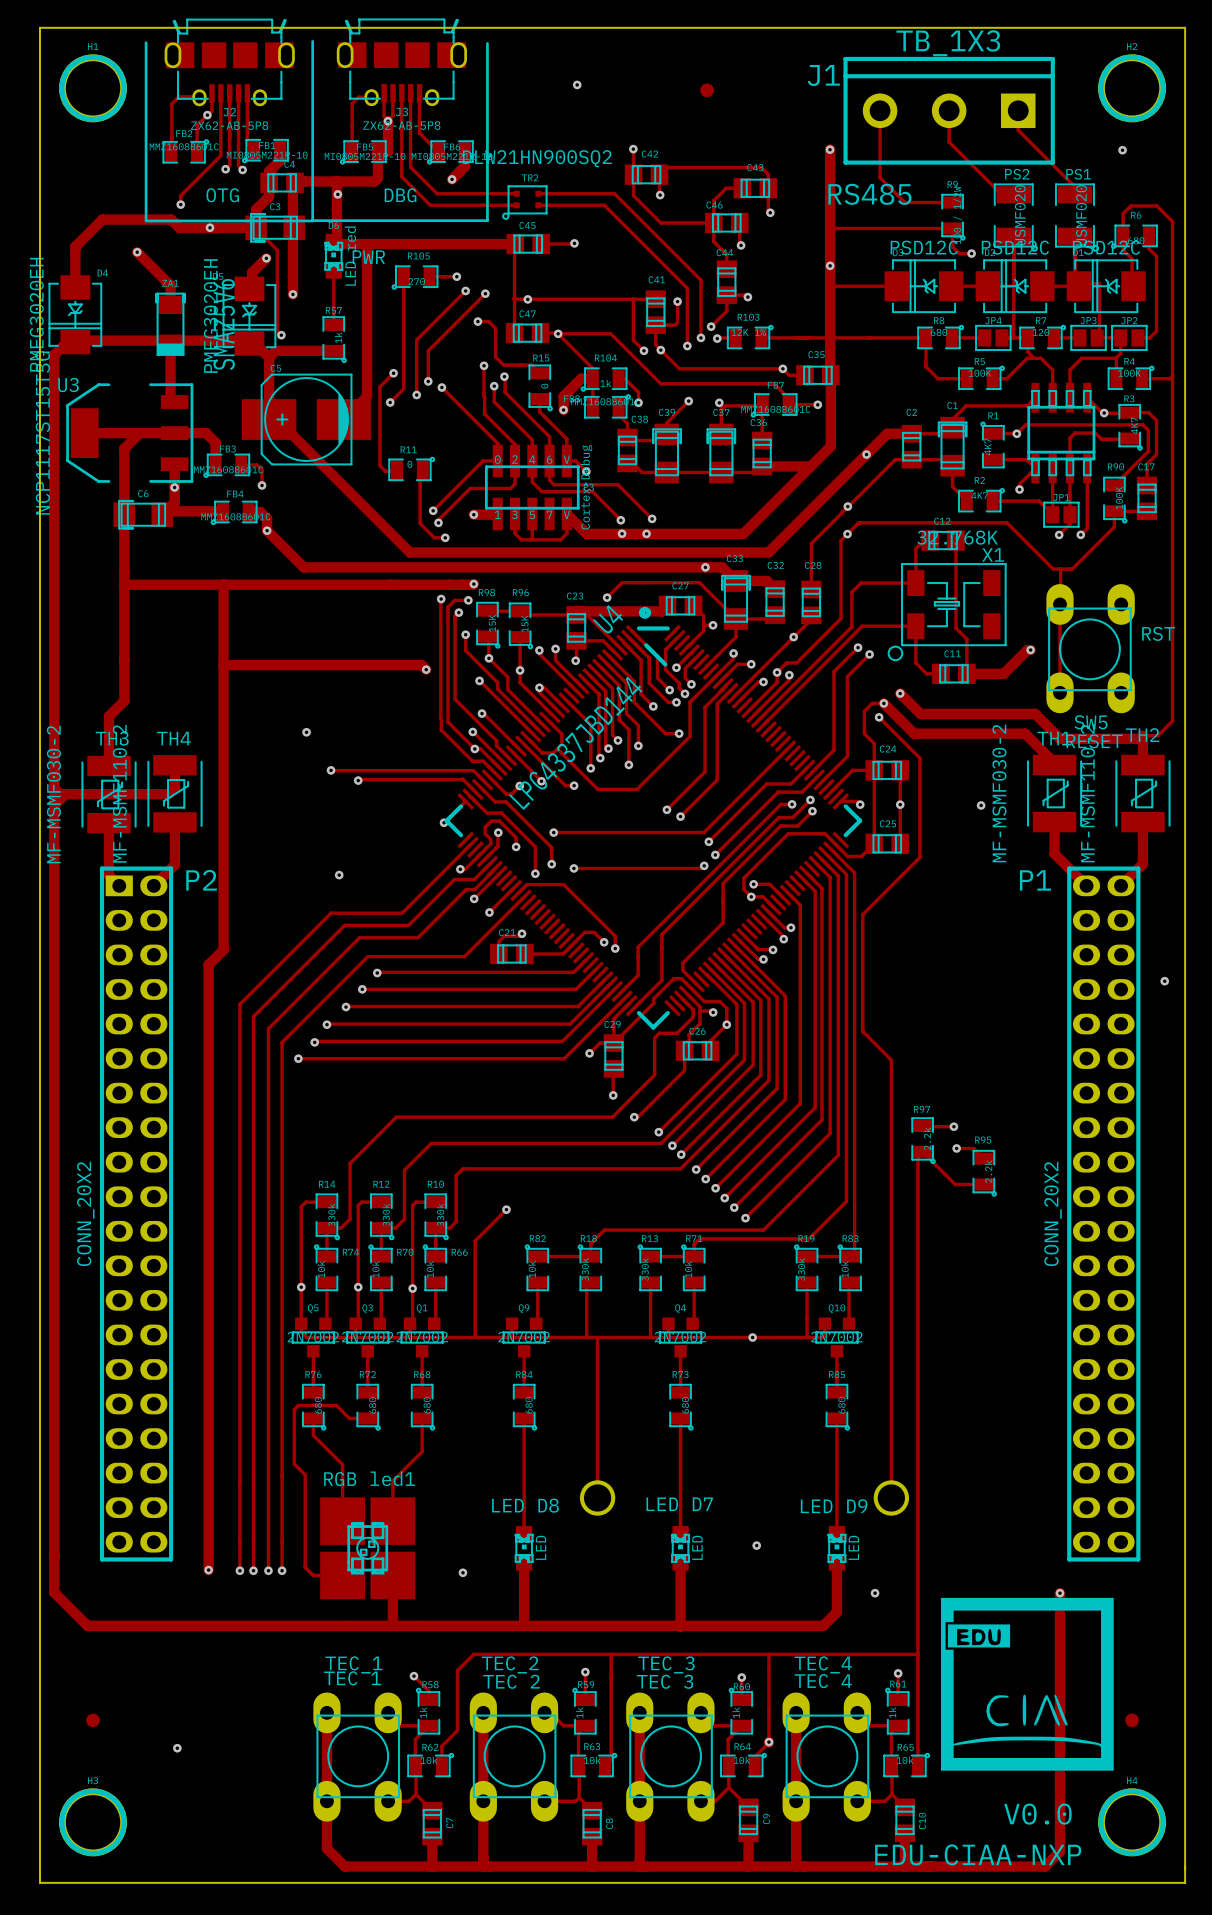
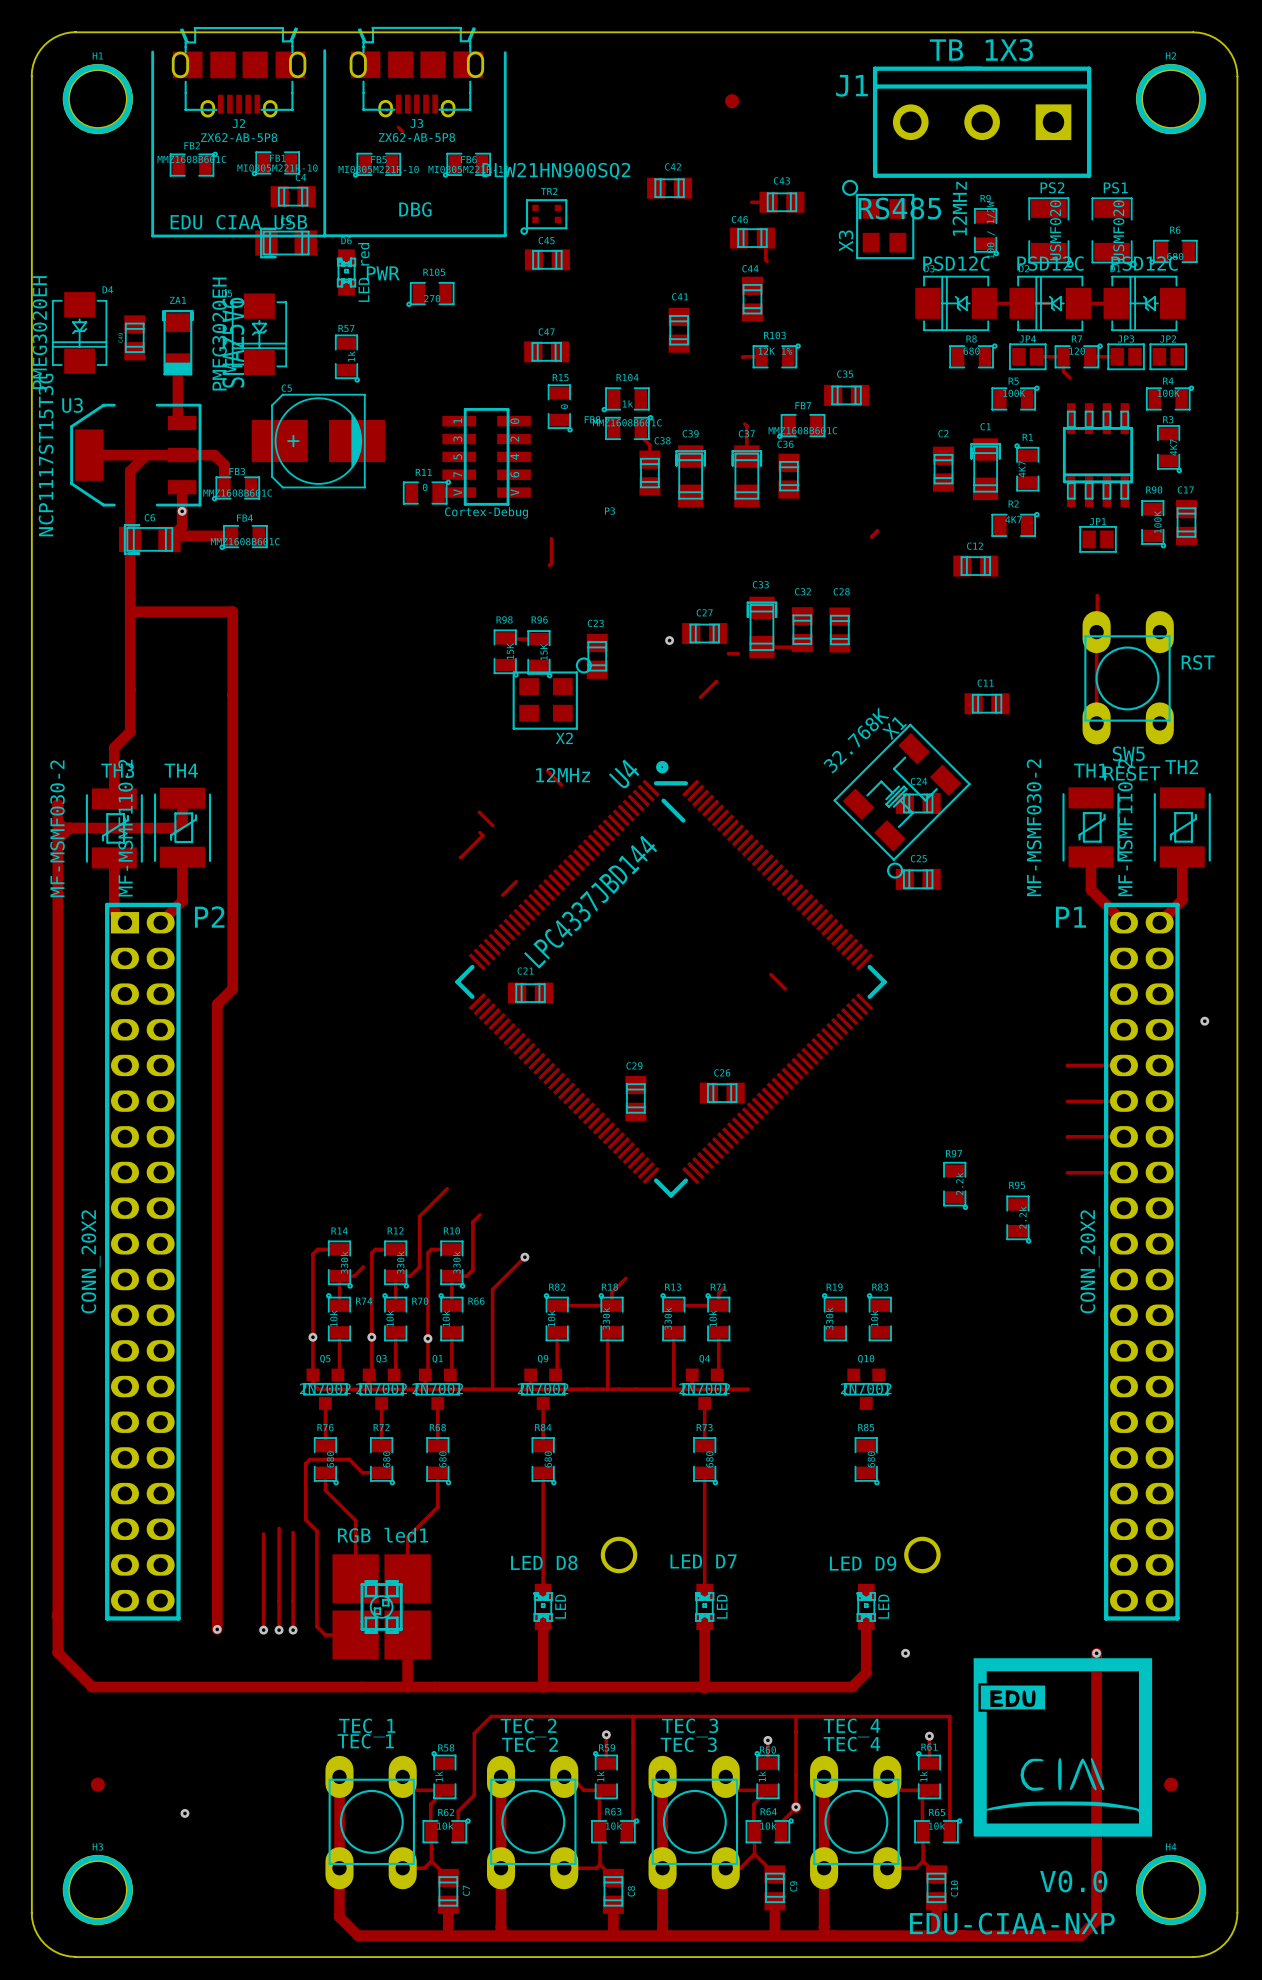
board edge: none -> (75, 32) (1193, 32) (1210, 35) (1224, 45) (1234, 59) (1237, 76)
board edge: none -> (75, 32) (59, 35) (44, 45) (35, 59) (31, 76)
board edge: (39, 27) (39, 1882) (1185, 1882) (1185, 27) (39, 27) -> none
board edge: none -> (31, 76) (31, 1913)
board edge: none -> (1237, 76) (1237, 1912) (1235, 1924) (1231, 1934) (1224, 1944) (1215, 1951) (1204, 1955) (1193, 1957) (75, 1957)
via: (577, 84) -> none
track: (212, 93) (212, 110) (207, 115) -> none
track: (220, 93) (220, 155) (180, 195) (180, 204) -> none
track: (229, 93) (229, 165) (225, 169) -> none
track: (238, 93) (238, 165) (242, 169) -> none
track: (247, 93) (247, 143) (254, 150) -> none
track: (384, 93) (384, 116) -> none
track: (392, 93) (392, 115) (388, 119) (388, 151) -> none
track: (401, 93) (401, 176) (430, 205) (516, 205) -> none
track: (410, 93) (410, 167) (437, 193) (516, 193) -> none
track: (419, 93) (419, 133) (438, 152) -> none
track: (199, 96) (179, 96) (171, 104) (171, 157) -> none
track: (371, 97) (358, 97) (352, 103) (352, 152) -> none
track: (880, 110) (880, 177) (904, 202) (952, 202) -> none
track: (949, 110) (949, 142) (1001, 194) (1013, 194) -> none
track: (1018, 110) (1018, 130) (1074, 186) (1074, 194) -> none
track: (207, 115) (197, 125) (197, 152) -> none
via: (207, 115) -> none
via: (388, 121) -> none
track: (633, 149) (633, 195) (660, 222) (713, 222) -> none
via: (633, 149) -> none
track: (830, 149) (830, 446) -> none
via: (830, 149) -> none
track: (280, 150) (280, 160) (269, 171) (269, 196) (256, 209) (256, 227) -> none
via: (1122, 150) -> none
track: (387, 151) (377, 151) (377, 178) (374, 181) (291, 181) (292, 294) -> none
track: (465, 151) (465, 166) (452, 179) -> none
via: (225, 169) -> none
via: (242, 169) -> none
via: (452, 179) -> none
track: (337, 181) (337, 238) (333, 242) (335, 244) (515, 244) -> none
track: (725, 188) (713, 200) -> none
track: (538, 193) (614, 193) (700, 280) (700, 337) -> none
via: (337, 194) -> none
text: OTG (222, 195) -> none
track: (660, 195) (659, 174) (666, 167) (761, 167) (768, 174) (768, 210) (770, 212) -> none
via: (660, 195) -> none
track: (713, 200) (713, 241) (726, 254) (726, 269) -> none
via: (180, 204) -> none
X3: none -> 12MHz (878, 219)
track: (538, 205) (604, 205) (687, 288) (687, 346) -> none
text: none -> EDU CIAA USB (238, 222)
via: (770, 212) -> none
track: (102, 219) (75, 246) (75, 287) -> none
track: (102, 219) (171, 219) -> none
track: (171, 219) (179, 227) (256, 227) -> none
via: (209, 227) -> none
track: (256, 227) (277, 250) (277, 331) (281, 335) -> none
track: (830, 229) (952, 228) (952, 246) (959, 253) (971, 253) -> none
track: (1149, 235) (1149, 248) (1156, 256) (1156, 331) (1149, 337) (1137, 337) -> none
track: (1013, 236) (1013, 337) -> none
track: (1074, 236) (1074, 283) (1099, 283) (1099, 335) (1097, 337) (1120, 337) (1120, 353) (1116, 357) (1116, 378) -> none
track: (574, 243) (541, 244) -> none
via: (574, 243) -> none
track: (367, 244) (367, 396) (343, 419) -> none
track: (515, 244) (514, 333) -> none
via: (741, 245) -> none
track: (137, 252) (170, 285) (170, 304) -> none
via: (137, 252) -> none
via: (971, 253) -> none
track: (266, 258) (252, 272) (252, 286) (249, 288) -> none
via: (266, 258) -> none
via: (830, 265) -> none
track: (333, 270) (333, 324) -> none
track: (403, 276) (403, 388) (390, 402) -> none
track: (429, 276) (456, 276) -> none
via: (456, 276) -> none
track: (1132, 283) (1132, 259) (1123, 250) (1123, 213) (1130, 205) (1156, 205) (1172, 221) (1172, 721) (1157, 735) (1142, 735) (1142, 764) -> none
track: (830, 286) (896, 286) -> none
track: (465, 290) (416, 339) (416, 395) -> none
via: (465, 290) -> none
track: (485, 293) (428, 350) (428, 381) -> none
via: (485, 293) -> none
via: (292, 294) -> none
track: (747, 297) (745, 295) (726, 295) (726, 311) (711, 326) -> none
via: (747, 297) -> none
track: (514, 298) (655, 299) -> none
via: (527, 299) -> none
track: (633, 299) (633, 340) (643, 350) -> none
track: (677, 301) (677, 322) (675, 325) (655, 325) (655, 345) (679, 368) (782, 368) (789, 375) (804, 375) -> none
via: (677, 301) -> none
part: none -> (134, 337)
track: (477, 321) (488, 321) (495, 328) (495, 356) (503, 365) (531, 365) (539, 373) -> none
via: (477, 321) -> none
via: (711, 326) -> none
track: (540, 333) (557, 333) (592, 368) (592, 407) -> none
track: (558, 333) (610, 333) (660, 383) (774, 383) (786, 395) (786, 405) (817, 404) -> none
via: (558, 333) -> none
via: (281, 335) -> none
via: (700, 337) -> none
track: (761, 337) (926, 337) (926, 366) (937, 378) (966, 378) -> none
track: (951, 337) (984, 337) -> none
via: (717, 338) -> none
via: (687, 346) -> none
track: (333, 350) (275, 350) (269, 357) -> none
via: (643, 350) -> none
via: (660, 350) -> none
track: (269, 357) (269, 419) (276, 419) (409, 552) (768, 552) (887, 433) (946, 433) (952, 427) (952, 419) (966, 405) (1027, 405) (1035, 397) -> none
track: (269, 357) (252, 340) (68, 340) (54, 354) (54, 771) -> none
track: (1116, 358) (1081, 358) (1069, 370) (1069, 397) -> none
track: (484, 365) (484, 414) (515, 444) (515, 484) (510, 488) (470, 488) (438, 520) (438, 522) -> none
via: (484, 365) -> none
via: (782, 368) -> none
track: (393, 373) (379, 386) (379, 465) (385, 471) (394, 471) -> none
via: (393, 373) -> none
track: (1172, 375) (1169, 378) (1142, 378) -> none
track: (504, 376) (505, 392) (549, 436) (549, 480) (554, 484) (617, 484) (652, 518) -> none
via: (504, 376) -> none
track: (592, 378) (581, 378) (563, 396) (563, 409) -> none
track: (992, 378) (1006, 378) (1027, 358) (1040, 358) (1052, 370) (1052, 397) -> none
via: (428, 381) -> none
track: (618, 382) (618, 378) (624, 378) (638, 392) (638, 402) -> none
track: (494, 386) (494, 401) (532, 439) (532, 482) (541, 491) (592, 491) (620, 520) -> none
via: (494, 386) -> none
track: (441, 387) (497, 443) (497, 460) (483, 460) (433, 510) -> none
via: (441, 387) -> none
via: (416, 395) -> none
track: (1087, 397) (1102, 413) (1136, 413) -> none
track: (539, 399) (539, 412) (566, 439) (566, 460) (575, 460) (586, 471) -> none
track: (688, 401) (666, 422) (666, 434) (660, 440) (619, 440) -> none
via: (688, 401) -> none
via: (390, 402) -> none
via: (638, 402) -> none
via: (719, 402) -> none
via: (817, 404) -> none
via: (563, 409) -> none
track: (721, 409) (725, 405) (765, 405) (762, 409) (762, 440) -> none
track: (1129, 412) (1148, 412) (1156, 420) (1156, 454) (1147, 464) (1147, 485) -> none
via: (1104, 413) -> none
track: (993, 433) (1016, 433) (1025, 424) (1142, 424) (1148, 430) (1148, 451) (1114, 485) -> none
via: (1016, 433) -> none
track: (1136, 439) (1101, 439) (1095, 433) (1074, 433) (1069, 438) (1069, 524) (1059, 534) -> none
track: (830, 446) (743, 533) (586, 533) (566, 514) (566, 533) (560, 539) (521, 539) (515, 533) (515, 514) -> none
via: (866, 454) -> none
track: (993, 459) (1026, 459) (1035, 468) (1019, 484) (1019, 489) -> none
track: (241, 464) (257, 464) (262, 469) (262, 485) -> none
track: (619, 466) (636, 466) (642, 472) (756, 472) (762, 466) -> none
track: (762, 466) (810, 466) -> none
track: (1052, 468) (1052, 514) (1039, 501) (992, 501) -> none
track: (1087, 468) (1087, 528) (1080, 534) -> none
track: (420, 471) (420, 523) (434, 537) (445, 537) -> none
via: (586, 471) -> none
via: (262, 485) -> none
part rotation: 0° (532, 487) -> 90° clockwise (486, 456)
part position: (532, 487) -> (486, 456)
via: (1019, 489) -> none
track: (966, 501) (952, 486) (952, 465) (946, 459) (895, 459) (811, 543) (811, 589) -> none
via: (847, 506) -> none
via: (433, 510) -> none
track: (248, 511) (260, 511) (267, 518) (267, 530) (303, 567) (722, 567) (735, 581) (766, 581) (775, 589) -> none
track: (1147, 511) (1114, 511) (1114, 526) (1072, 569) (1053, 569) (1006, 522) (858, 522) (841, 540) (841, 618) (796, 662) (786, 662) (777, 672) (777, 682) (749, 710) -> none
track: (496, 513) (497, 514) (473, 514) -> none
via: (473, 514) -> none
via: (652, 518) -> none
via: (620, 520) -> none
via: (438, 522) -> none
via: (267, 530) -> none
via: (622, 533) -> none
via: (646, 533) -> none
via: (847, 534) -> none
via: (1059, 534) -> none
via: (1080, 534) -> none
via: (445, 537) -> none
track: (930, 544) (919, 544) (915, 548) (915, 583) (861, 583) (851, 592) (851, 626) (759, 719) -> none
track: (955, 544) (955, 628) (966, 639) (966, 673) (1003, 673) (1027, 650) (1030, 650) -> none
via: (705, 567) -> none
track: (473, 584) (223, 584) -> none
via: (473, 584) -> none
track: (607, 597) (622, 582) (699, 582) (735, 619) (735, 637) (706, 666) -> none
via: (607, 597) -> none
track: (441, 599) (441, 730) (472, 761) (483, 761) (494, 772) -> none
via: (441, 599) -> none
track: (468, 600) (454, 600) (447, 607) (447, 722) (474, 748) (480, 748) (499, 767) -> none
via: (468, 600) -> none
track: (667, 605) (662, 611) (580, 611) (576, 614) (523, 614) -> none
track: (693, 605) (703, 615) (703, 630) (686, 647) -> none
track: (572, 611) (583, 611) (619, 647) -> none
via: (458, 612) -> none
X1 rotation: 0° (947, 612) -> 45° counterclockwise (902, 801)
X1 position: (947, 612) -> (902, 801)
track: (811, 615) (811, 619) (735, 695) -> none
track: (455, 616) (455, 699) (496, 740) (496, 745) (509, 758) -> none
via: (713, 625) -> none
track: (634, 633) (657, 656) (657, 677) (669, 690) -> none
track: (465, 634) (465, 650) -> none
via: (465, 634) -> none
track: (487, 636) (488, 658) (507, 677) (507, 689) (542, 724) -> none
track: (520, 637) (520, 682) (552, 714) -> none
track: (629, 637) (649, 657) (649, 683) (668, 702) (676, 702) -> none
track: (677, 637) (665, 649) (665, 669) (679, 683) (679, 688) (684, 693) -> none
via: (793, 637) -> none
track: (624, 642) (641, 660) (641, 694) (653, 706) -> none
track: (858, 647) (833, 671) (833, 750) (811, 772) -> none
via: (858, 647) -> none
track: (555, 648) (555, 660) (581, 686) -> none
via: (555, 648) -> none
track: (465, 650) (497, 682) -> none
track: (539, 650) (539, 653) (576, 690) -> none
via: (539, 650) -> none
via: (1030, 650) -> none
track: (614, 652) (603, 640) (576, 640) (575, 660) -> none
track: (733, 653) (733, 658) (690, 702) (690, 736) (637, 789) (597, 789) (557, 748) -> none
via: (733, 653) -> none
track: (869, 654) (847, 676) (847, 756) (821, 782) -> none
via: (869, 654) -> none
track: (610, 657) (634, 681) (634, 702) (665, 733) (679, 733) -> none
track: (696, 657) (685, 668) (685, 678) (691, 684) -> none
via: (488, 658) -> none
via: (575, 660) -> none
track: (605, 662) (626, 683) (626, 713) (638, 725) (638, 745) -> none
X2: none -> 12MHz (552, 693)
track: (751, 664) (737, 664) (720, 681) -> none
via: (751, 664) -> none
track: (223, 665) (421, 665) (426, 669) -> none
track: (600, 666) (619, 685) (619, 720) -> none
via: (676, 667) -> none
via: (426, 669) -> none
via: (520, 670) -> none
track: (595, 671) (612, 688) (612, 735) (617, 740) -> none
via: (777, 672) -> none
track: (940, 673) (926, 673) (915, 662) (915, 626) (862, 626) (763, 724) -> none
track: (789, 675) (789, 679) (754, 714) -> none
via: (789, 675) -> none
track: (590, 676) (605, 691) (605, 745) (608, 748) -> none
track: (479, 680) (533, 733) -> none
via: (479, 680) -> none
track: (585, 681) (598, 694) (600, 758) -> none
track: (763, 681) (758, 681) (739, 700) -> none
via: (763, 681) -> none
track: (497, 682) (497, 689) (537, 729) -> none
via: (691, 684) -> none
track: (725, 686) (705, 707) (705, 771) (666, 809) -> none
via: (539, 687) -> none
via: (669, 690) -> none
track: (730, 690) (717, 703) (717, 779) (680, 816) -> none
via: (684, 693) -> none
track: (900, 693) (920, 713) (1035, 713) (1060, 738) (1142, 738) -> none
via: (900, 693) -> none
track: (566, 700) (590, 724) (590, 768) -> none
via: (676, 702) -> none
via: (883, 703) -> none
track: (561, 705) (544, 687) (539, 687) (539, 692) (557, 710) -> none
via: (653, 706) -> none
track: (481, 713) (518, 748) -> none
via: (481, 713) -> none
track: (879, 717) (919, 758) (919, 857) (862, 914) (862, 1031) (891, 1060) (891, 1497) -> none
via: (879, 717) -> none
track: (547, 719) (561, 734) (561, 744) (553, 753) (542, 753) -> none
track: (619, 720) (628, 729) (628, 764) -> none
track: (472, 731) (504, 763) -> none
via: (472, 731) -> none
via: (306, 732) -> none
via: (679, 733) -> none
via: (617, 740) -> none
track: (523, 743) (565, 785) (574, 785) -> none
via: (638, 745) -> none
via: (474, 748) -> none
via: (608, 748) -> none
track: (787, 748) (703, 832) (553, 832) -> none
track: (513, 753) (541, 780) -> none
via: (600, 758) -> none
via: (628, 764) -> none
track: (1054, 764) (1025, 733) (914, 733) (883, 703) (872, 703) (864, 711) (864, 733) (874, 743) (874, 843) (861, 856) (847, 856) -> none
track: (807, 767) (790, 783) (766, 783) (708, 841) -> none
via: (590, 768) -> none
track: (331, 770) (473, 770) (485, 782) -> none
via: (331, 770) -> none
track: (874, 770) (852, 770) (831, 791) -> none
track: (900, 770) (900, 843) -> none
track: (489, 777) (506, 794) (511, 794) (519, 786) -> none
track: (816, 777) (802, 792) (778, 792) (715, 854) -> none
track: (463, 779) (358, 780) -> none
via: (358, 780) -> none
via: (541, 781) -> none
via: (574, 785) -> none
via: (519, 786) -> none
track: (480, 787) (495, 801) (506, 801) (551, 847) (551, 864) -> none
track: (470, 797) (487, 813) (501, 813) (535, 846) (535, 873) -> none
track: (810, 799) (792, 817) (778, 817) (661, 934) (661, 980) (634, 1008) -> none
via: (810, 799) -> none
track: (840, 801) (857, 801) (860, 804) -> none
via: (792, 804) -> none
via: (860, 804) -> none
via: (900, 804) -> none
track: (790, 805) (792, 804) (780, 804) (638, 947) (638, 975) (619, 993) -> none
via: (981, 805) -> none
via: (666, 809) -> none
track: (812, 811) (797, 826) (780, 826) (723, 883) (723, 922) (682, 962) (682, 970) (696, 984) -> none
via: (812, 811) -> none
via: (680, 816) -> none
U4 position: (653, 818) -> (670, 979)
via: (444, 822) -> none
track: (498, 832) (497, 846) -> none
via: (498, 832) -> none
via: (553, 832) -> none
track: (490, 838) (485, 833) (485, 827) (491, 821) (499, 821) (516, 837) (516, 846) -> none
track: (490, 839) (490, 843) (465, 869) (460, 869) -> none
via: (708, 841) -> none
track: (470, 844) (402, 913) (331, 913) (239, 1004) (239, 1570) -> none
via: (516, 846) -> none
track: (831, 849) (854, 872) (854, 1252) (850, 1256) (807, 1256) -> none
via: (715, 854) -> none
track: (826, 854) (846, 874) -> none
track: (848, 856) (825, 833) (788, 833) (743, 878) (743, 889) (751, 896) (763, 896) (773, 907) -> none
track: (821, 859) (838, 875) (838, 1155) (763, 1230) (604, 1230) -> none
track: (489, 863) (474, 879) (454, 879) (408, 925) (344, 925) (253, 1016) (253, 1477) -> none
track: (816, 863) (830, 877) (830, 1133) (745, 1218) -> none
via: (551, 864) -> none
track: (704, 865) (701, 868) (573, 868) -> none
via: (704, 865) -> none
track: (494, 868) (474, 889) (466, 889) (418, 937) (359, 937) (268, 1028) (268, 1472) -> none
via: (573, 868) -> none
via: (460, 869) -> none
track: (499, 873) (474, 898) -> none
via: (535, 873) -> none
track: (807, 873) (822, 888) (822, 1119) (734, 1207) -> none
via: (339, 875) -> none
track: (846, 875) (846, 1201) (809, 1238) (699, 1238) -> none
track: (802, 878) (815, 891) (815, 1107) (724, 1198) -> none
track: (753, 884) (769, 884) (783, 897) -> none
via: (753, 884) -> none
track: (513, 888) (489, 912) -> none
track: (518, 892) (526, 884) (563, 884) (615, 936) (615, 948) -> none
track: (787, 892) (800, 905) (800, 1103) (715, 1188) -> none
via: (751, 896) -> none
track: (523, 897) (464, 956) (367, 956) (282, 1042) (282, 1476) -> none
via: (474, 898) -> none
via: (489, 912) -> none
track: (768, 912) (784, 927) (790, 927) -> none
track: (763, 916) (783, 936) (783, 939) -> none
via: (790, 927) -> none
track: (521, 933) (519, 936) (504, 936) (498, 941) (498, 953) -> none
via: (521, 933) -> none
via: (783, 939) -> none
track: (740, 940) (758, 959) (763, 959) -> none
track: (604, 942) (594, 932) (584, 932) (563, 953) (524, 953) -> none
via: (604, 942) -> none
track: (735, 945) (785, 995) (785, 1099) (705, 1179) -> none
via: (615, 948) -> none
track: (758, 949) (773, 949) -> none
via: (773, 949) -> none
track: (730, 950) (777, 997) (777, 1088) (696, 1169) -> none
track: (725, 955) (768, 998) (768, 1080) (680, 1168) (462, 1168) -> none
via: (763, 959) -> none
track: (585, 960) (573, 972) (377, 972) -> none
track: (720, 960) (760, 1000) (760, 1075) (681, 1154) -> none
track: (715, 964) (753, 1002) (753, 1064) (672, 1145) -> none
track: (595, 969) (575, 989) -> none
track: (711, 969) (744, 1003) (744, 1060) (661, 1143) (431, 1143) -> none
via: (377, 973) -> none
track: (706, 974) (736, 1004) (736, 1054) (658, 1132) -> none
track: (605, 979) (577, 1006) -> none
track: (610, 984) (570, 1024) (326, 1024) -> none
track: (614, 988) (562, 1041) (314, 1042) -> none
track: (362, 989) (575, 989) -> none
via: (362, 989) -> none
track: (686, 993) (700, 1006) (700, 1023) (689, 1034) (689, 1046) (684, 1050) (684, 1070) (637, 1117) (634, 1117) -> none
track: (624, 998) (564, 1058) (298, 1058) -> none
track: (682, 998) (693, 1009) (693, 1017) (677, 1033) (659, 1033) (654, 1037) (654, 1075) (612, 1117) (396, 1117) (350, 1163) (350, 1219) -> none
track: (629, 1003) (613, 1018) (613, 1043) -> none
track: (578, 1006) (345, 1007) -> none
via: (345, 1007) -> none
track: (700, 1011) (713, 1012) -> none
via: (713, 1012) -> none
via: (326, 1024) -> none
via: (726, 1024) -> none
track: none -> (1123, 1065) (1067, 1065)
via: (314, 1042) -> none
track: (613, 1043) (653, 1003) (653, 998) (673, 978) (681, 978) (704, 1001) (720, 1001) (726, 1008) (726, 1024) (710, 1040) (710, 1050) -> none
track: (613, 1043) (599, 1043) (589, 1053) -> none
via: (589, 1053) -> none
via: (298, 1058) -> none
track: none -> (1123, 1101) (1067, 1101)
track: (613, 1068) (613, 1095) -> none
track: none -> (1123, 1136) (1067, 1137)
via: (613, 1095) -> none
via: (634, 1117) -> none
track: (922, 1125) (953, 1126) -> none
via: (953, 1126) -> none
track: none -> (1123, 1172) (1067, 1172)
via: (658, 1132) -> none
via: (672, 1145) -> none
track: (956, 1148) (973, 1148) (983, 1158) -> none
via: (956, 1148) -> none
via: (681, 1154) -> none
via: (696, 1169) -> none
via: (705, 1179) -> none
track: (983, 1184) (955, 1184) (922, 1151) (917, 1156) (917, 1654) -> none
via: (715, 1188) -> none
via: (724, 1198) -> none
via: (734, 1207) -> none
via: (745, 1218) -> none
track: (807, 1282) (807, 1337) -> none
track: (849, 1283) (849, 1323) -> none
track: (824, 1323) (824, 1337) (722, 1337) -> none
track: (597, 1337) (597, 1497) -> none
via: (752, 1337) -> none
track: (836, 1351) (836, 1392) -> none
track: (836, 1418) (836, 1534) -> none
via: (756, 1545) -> none
via: (239, 1570) -> none
via: (462, 1572) -> none
track: (413, 1676) (428, 1691) (428, 1699) -> none
via: (413, 1676) -> none
board edge: none -> (31, 1912) (35, 1929) (44, 1943) (59, 1953) (75, 1956)

